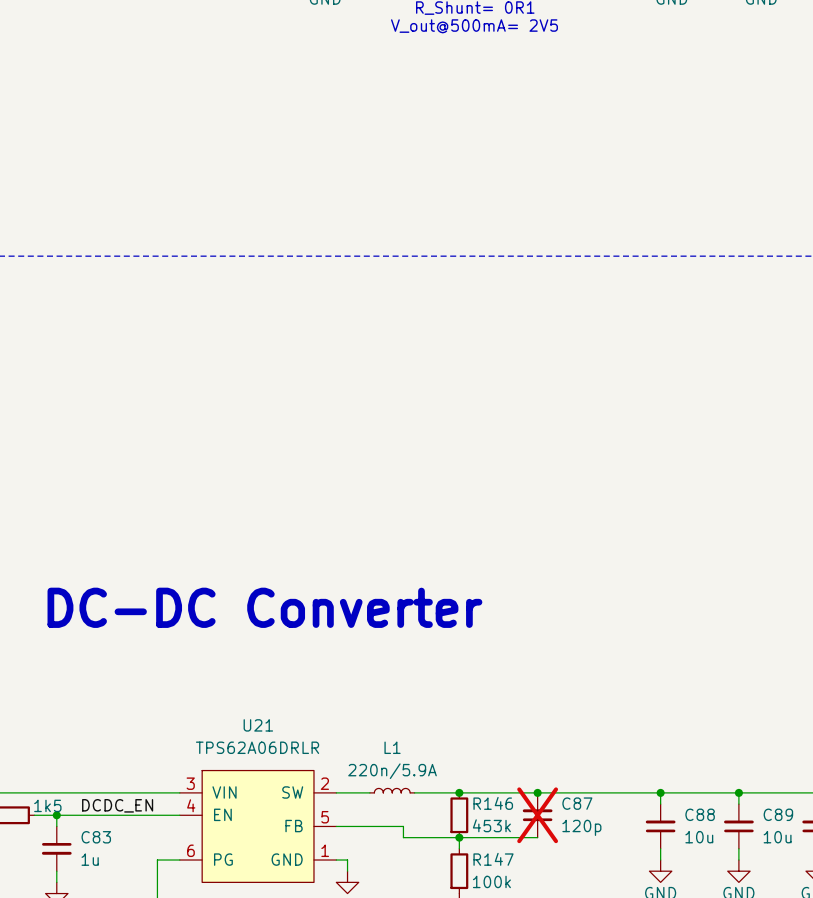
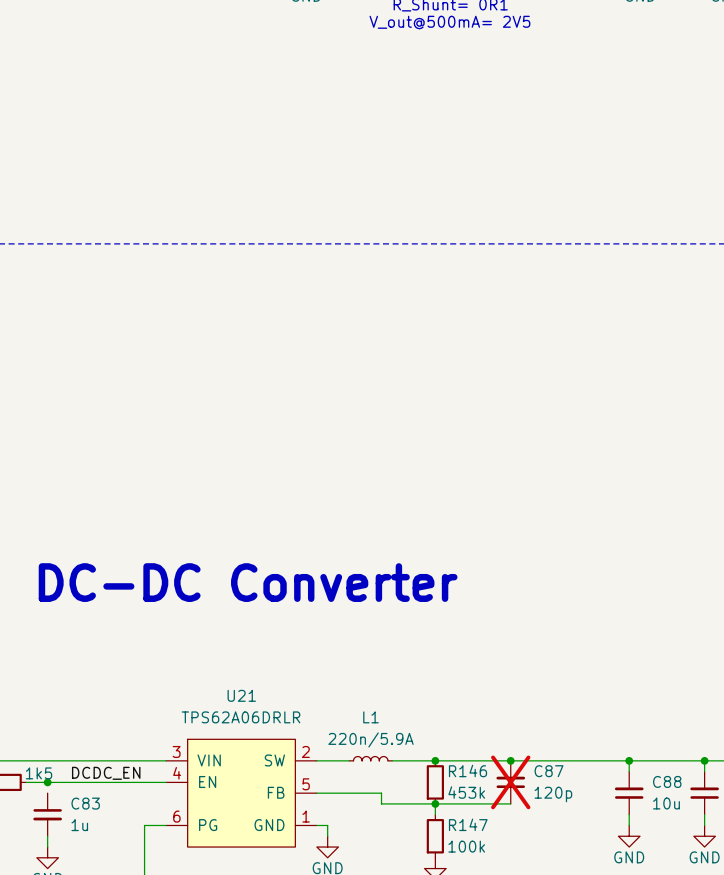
wire: (56, 815) (56, 826) -> none

